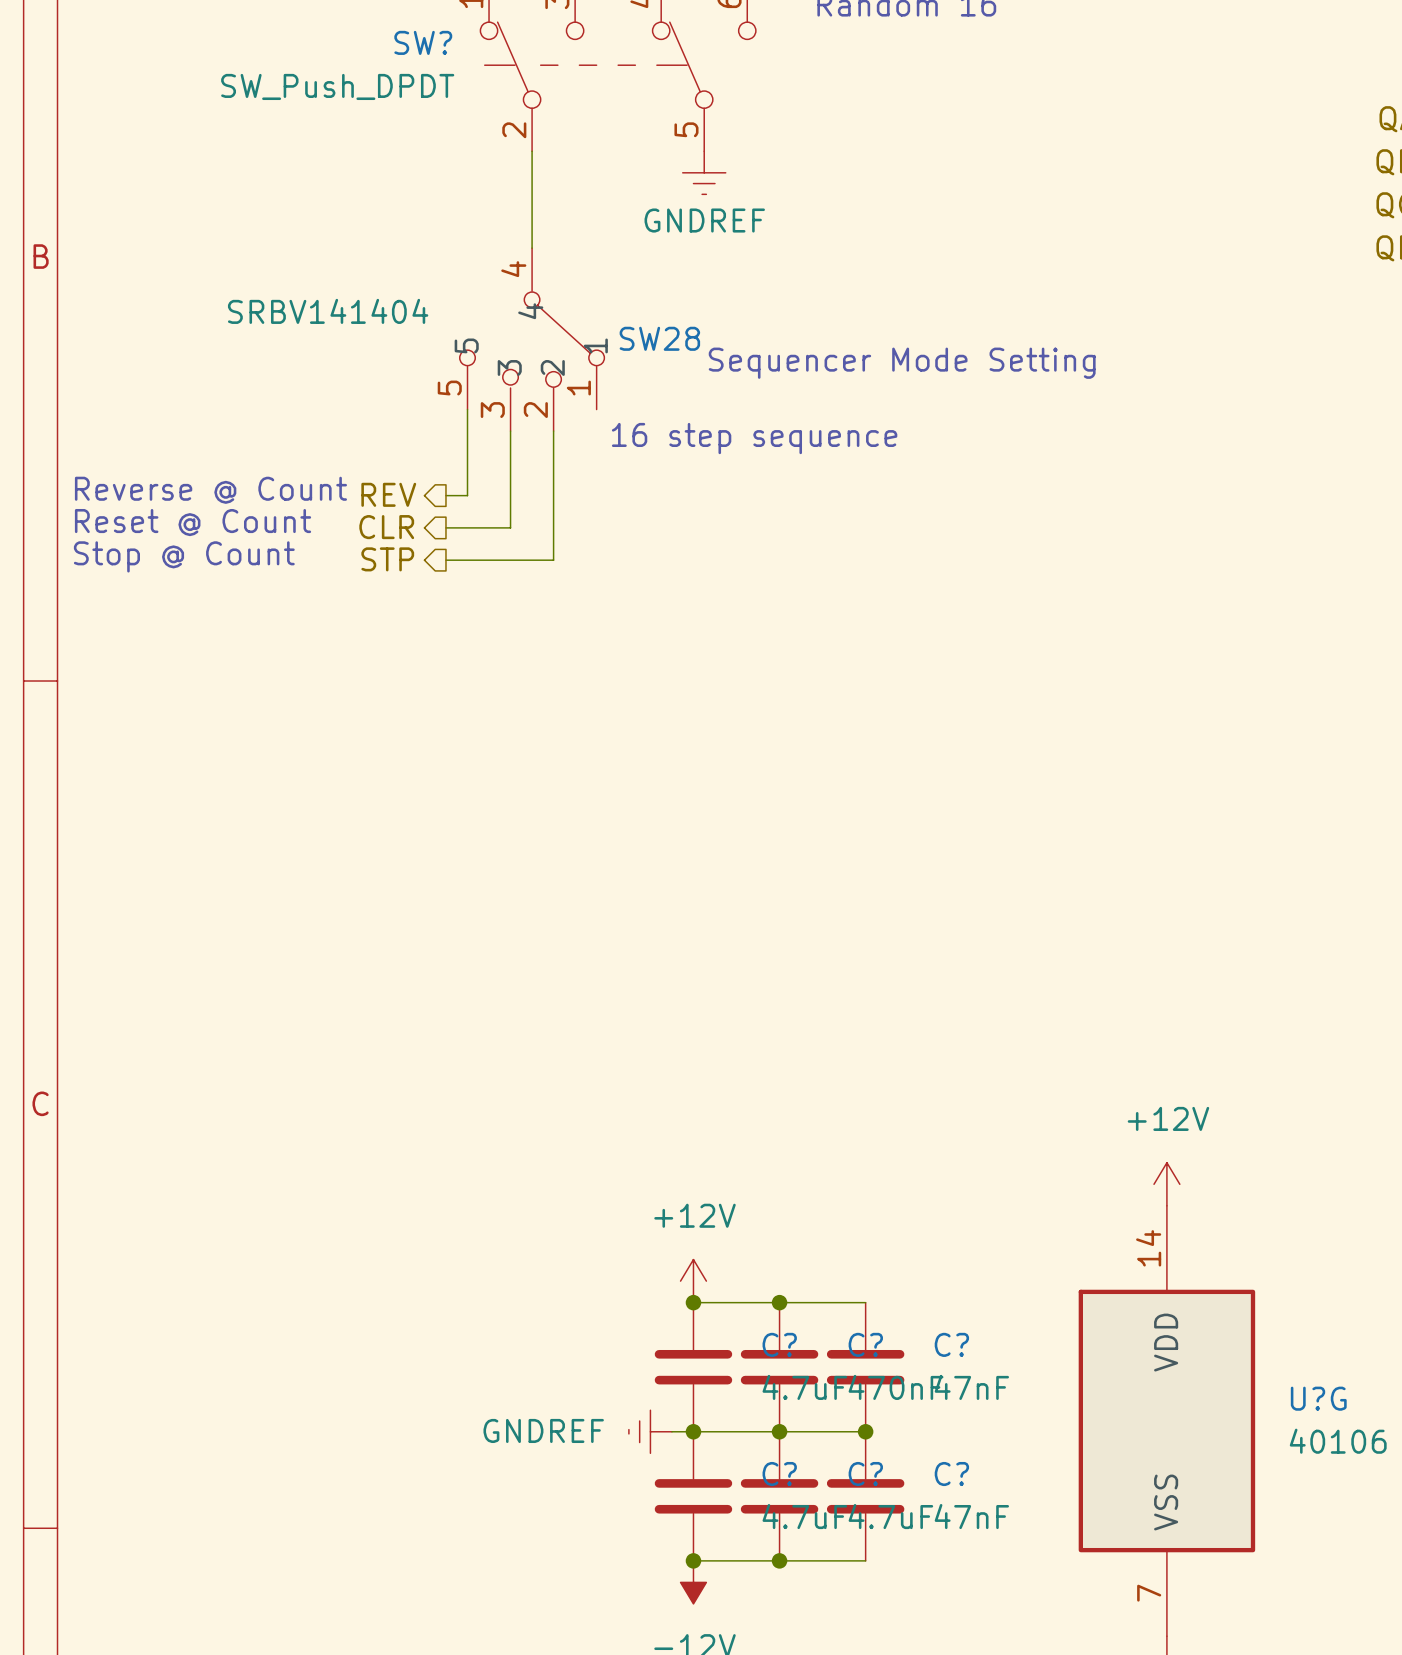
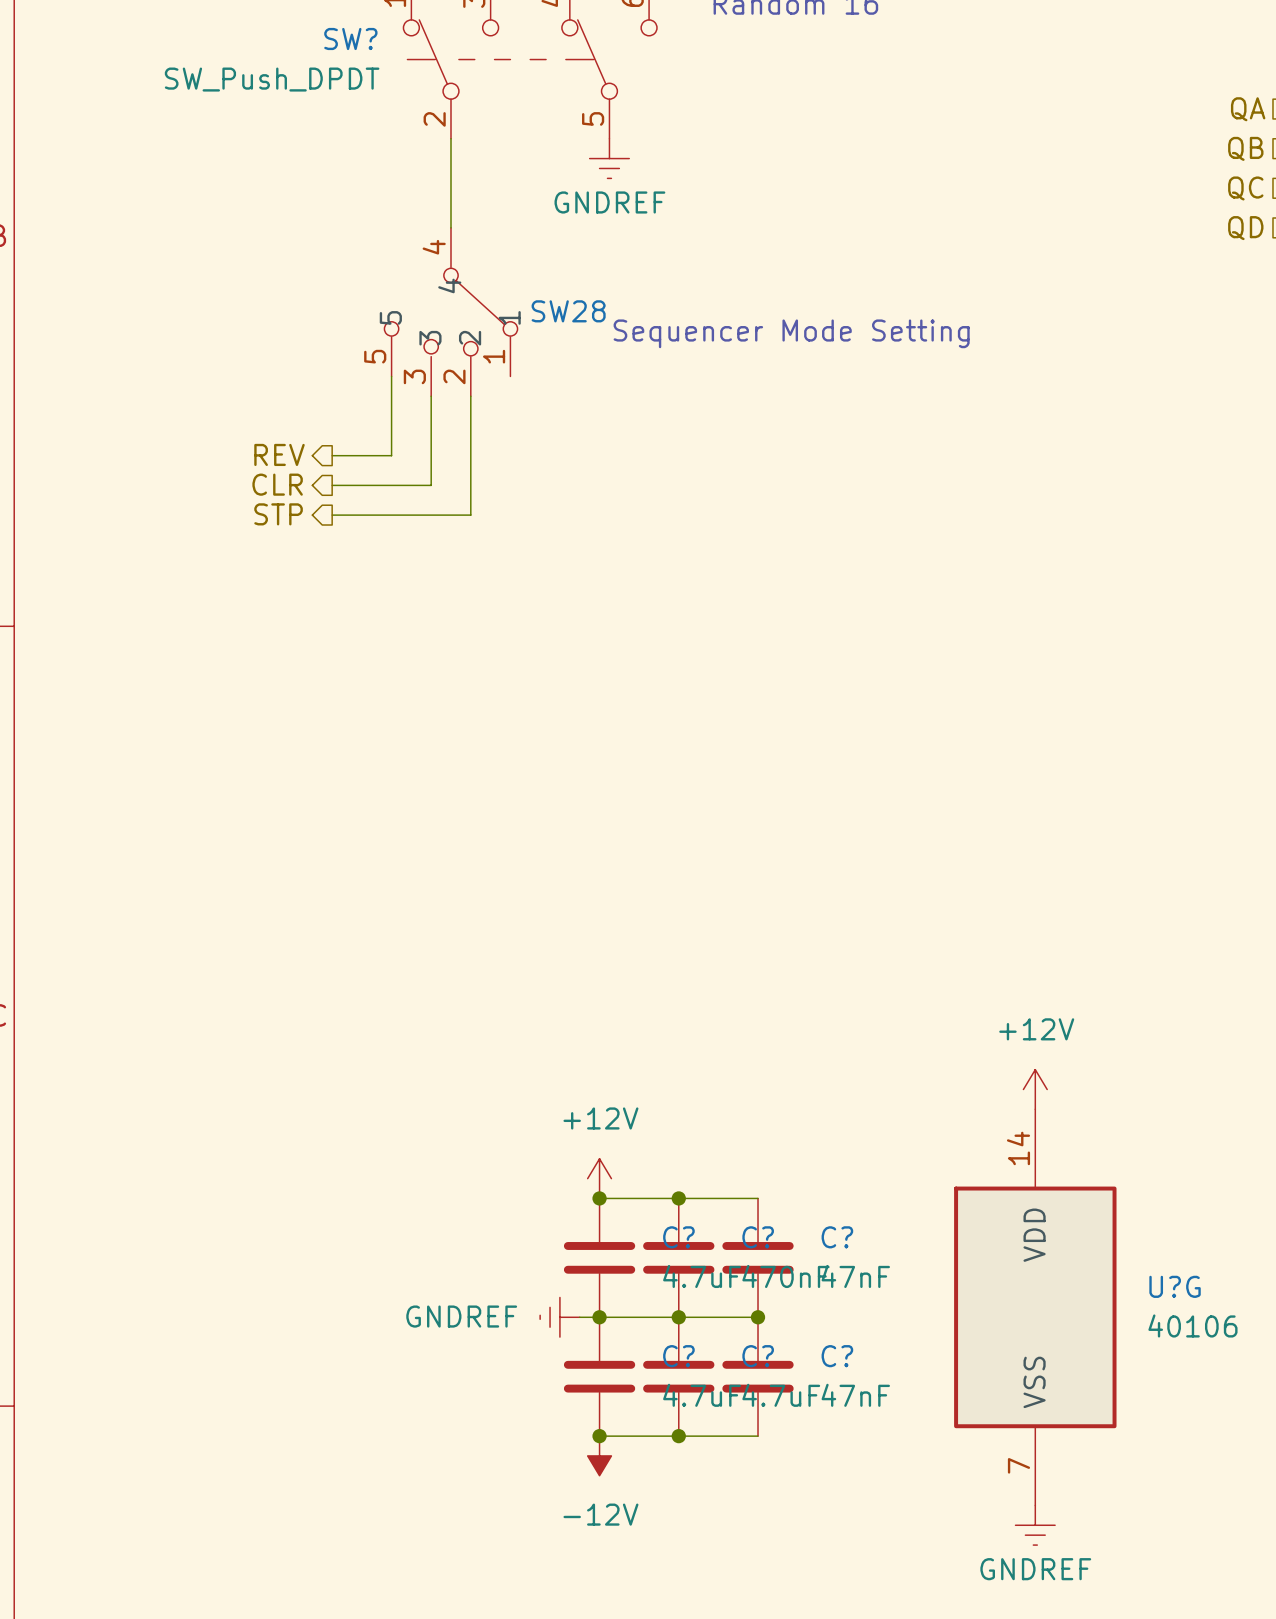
SW28 value: SRBV141404 (328, 311) -> none
text: 16 step sequence (754, 438) -> none
text: Reverse @ Count (210, 490) -> none
hierarchical label position: REV (388, 494) -> REV (279, 454)
wire: none -> (332, 455) (371, 455)
text: Reset @ Count (193, 522) -> none
hierarchical label position: CLR (386, 527) -> CLR (277, 484)
wire: none -> (332, 485) (371, 485)
text: Stop @ Count (184, 556) -> none
hierarchical label position: STP (387, 559) -> STP (278, 514)
wire: none -> (332, 515) (371, 515)

